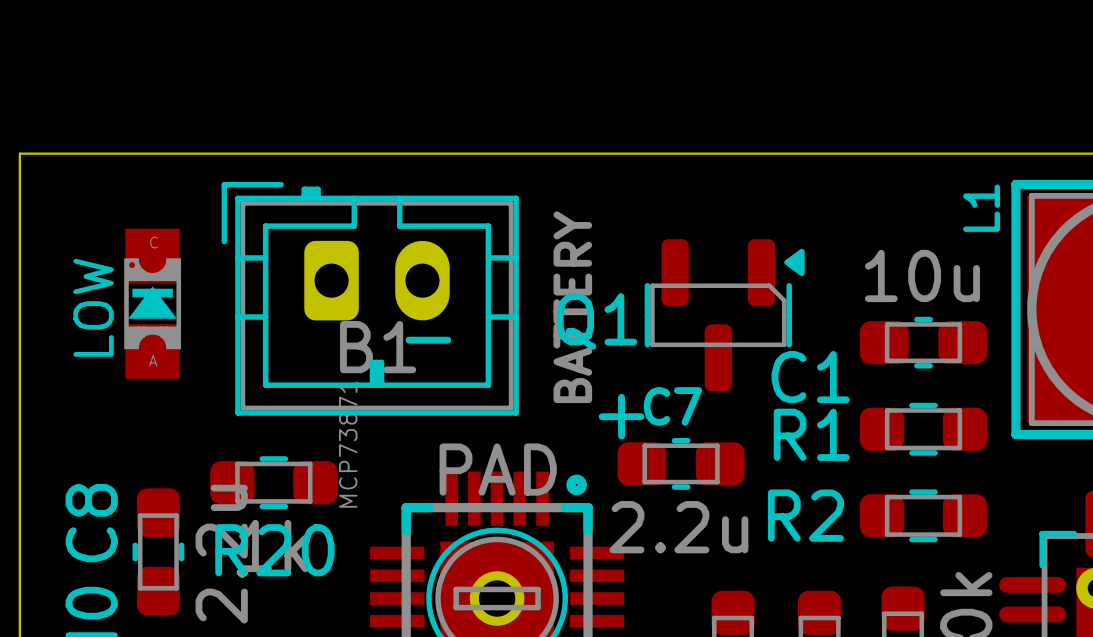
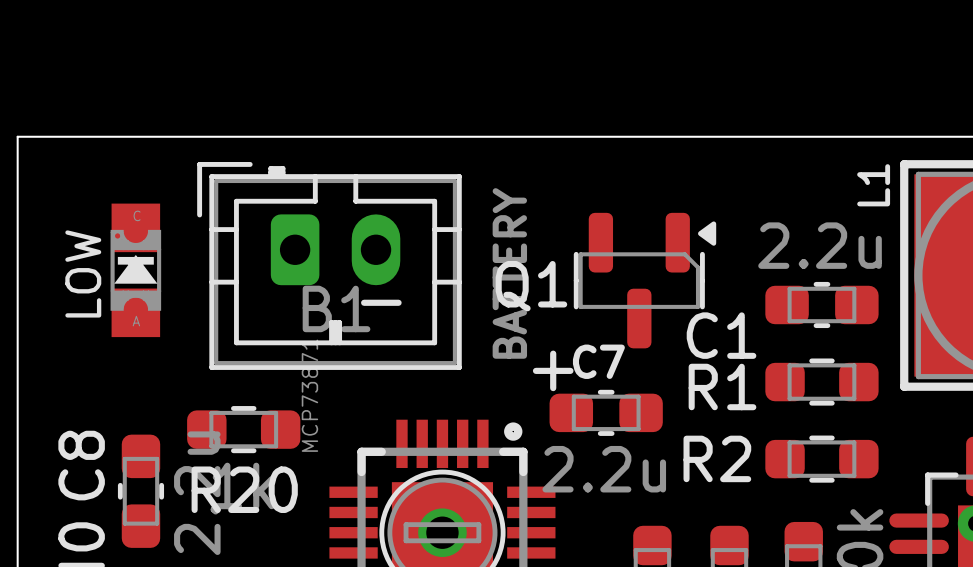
C1 value: 10u (922, 275) -> 2.2u (820, 245)
part value: PAD (498, 469) -> none

